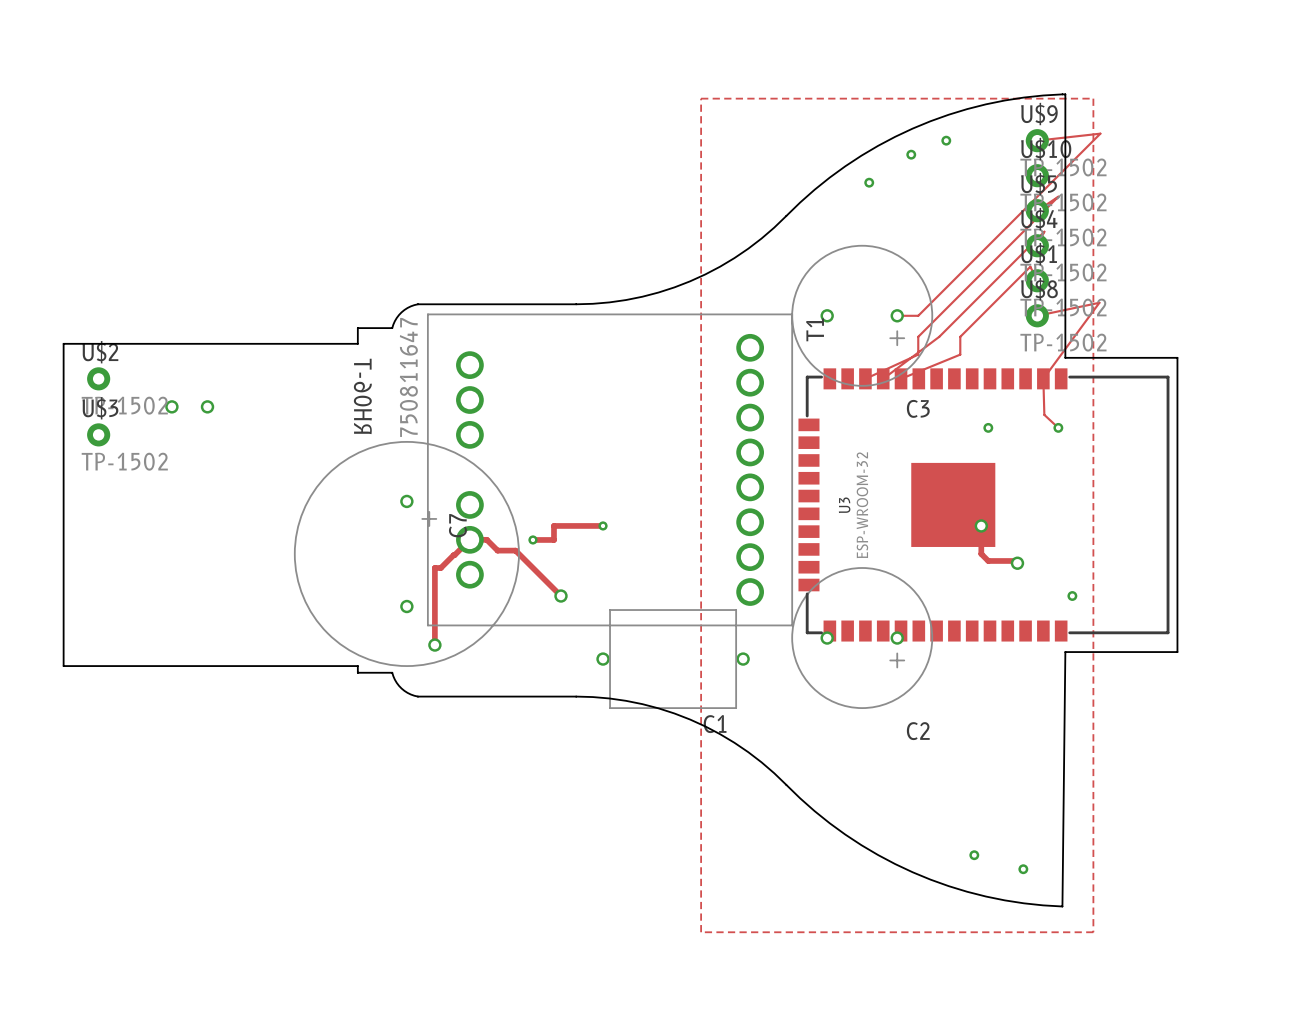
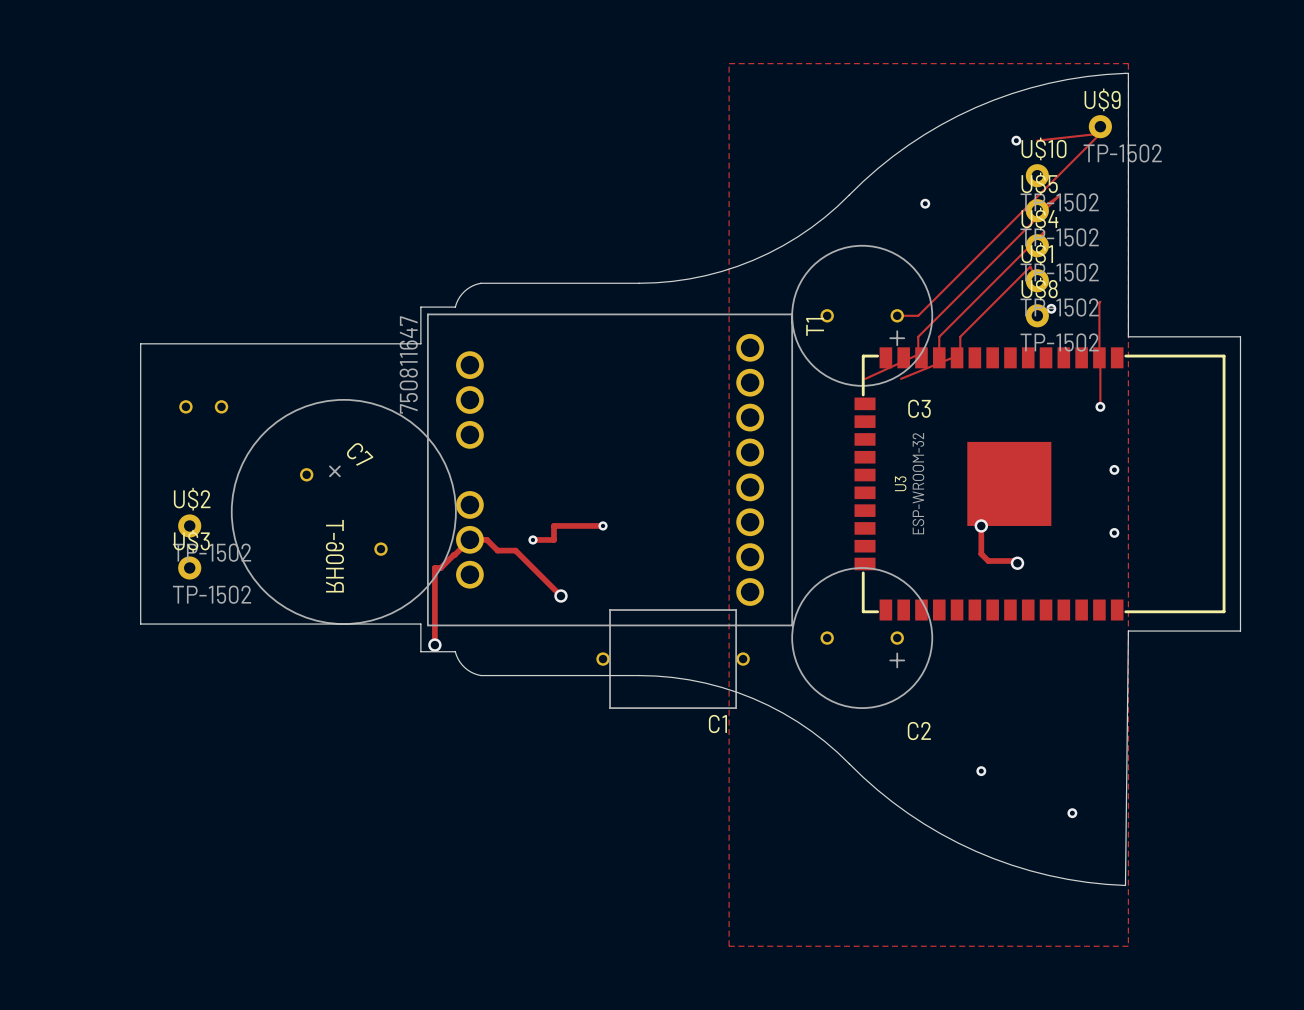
zone outline: (701, 98) (1093, 98) (1093, 932) (701, 932) (701, 98) -> (729, 63) (729, 946) (1128, 946) (1128, 63) (729, 63)
via: (946, 140) -> none
via: none -> (1016, 140)
U$9 position: (1037, 140) -> (1100, 126)
via: (911, 154) -> none
via: (869, 182) -> none
via: none -> (925, 203)
track: none -> (1100, 301) (1100, 406)
via: none -> (1051, 308)
track: (1037, 315) (1099, 302) (1043, 378) (1044, 414) (1058, 427) -> none
track: (939, 336) (883, 378) -> (939, 336) (939, 357)
board edge: (140, 343) (63, 343) (63, 666) (357, 666) (357, 672) (392, 672) (401, 688) (417, 696) (592, 697) (642, 704) (690, 719) (734, 742) (761, 762) (829, 823) (861, 845) (895, 864) (948, 886) (985, 896) (1023, 903) (1062, 906) (1065, 652) (1177, 652) (1177, 357) (1065, 357) (1065, 94) (1023, 97) (985, 104) (948, 114) (895, 136) (861, 155) (829, 177) (748, 248) (705, 274) (674, 287) (642, 296) (592, 303) (417, 304) (401, 312) (392, 328) (357, 328) (357, 343) -> (140, 343) (140, 624) (420, 624) (420, 651) (455, 651) (464, 667) (481, 675) (655, 676) (689, 679) (721, 687) (768, 705) (797, 721) (824, 741) (892, 802) (924, 824) (958, 843) (1011, 865) (1048, 875) (1086, 882) (1125, 885) (1128, 631) (1240, 631) (1240, 336) (1128, 336) (1128, 73) (1086, 76) (1048, 83) (1011, 93) (958, 115) (924, 134) (892, 156) (811, 227) (768, 253) (737, 266) (705, 275) (655, 282) (481, 283) (464, 291) (455, 307) (420, 307) (420, 343) (357, 343)
U$2 position: (98, 378) -> (189, 525)
part position: (362, 396) -> (334, 556)
part position: (189, 406) -> (203, 406)
via: none -> (1100, 406)
via: (988, 427) -> none
via: (1058, 427) -> none
U$3 position: (98, 434) -> (189, 567)
via: none -> (1114, 469)
U3 position: (983, 504) -> (1040, 483)
via: none -> (1114, 532)
C7 rotation: 0° (406, 553) -> 45° counterclockwise (343, 511)
via: (1072, 596) -> none
via: none -> (981, 771)
via: none -> (1072, 813)
via: (974, 855) -> none
via: (1023, 869) -> none

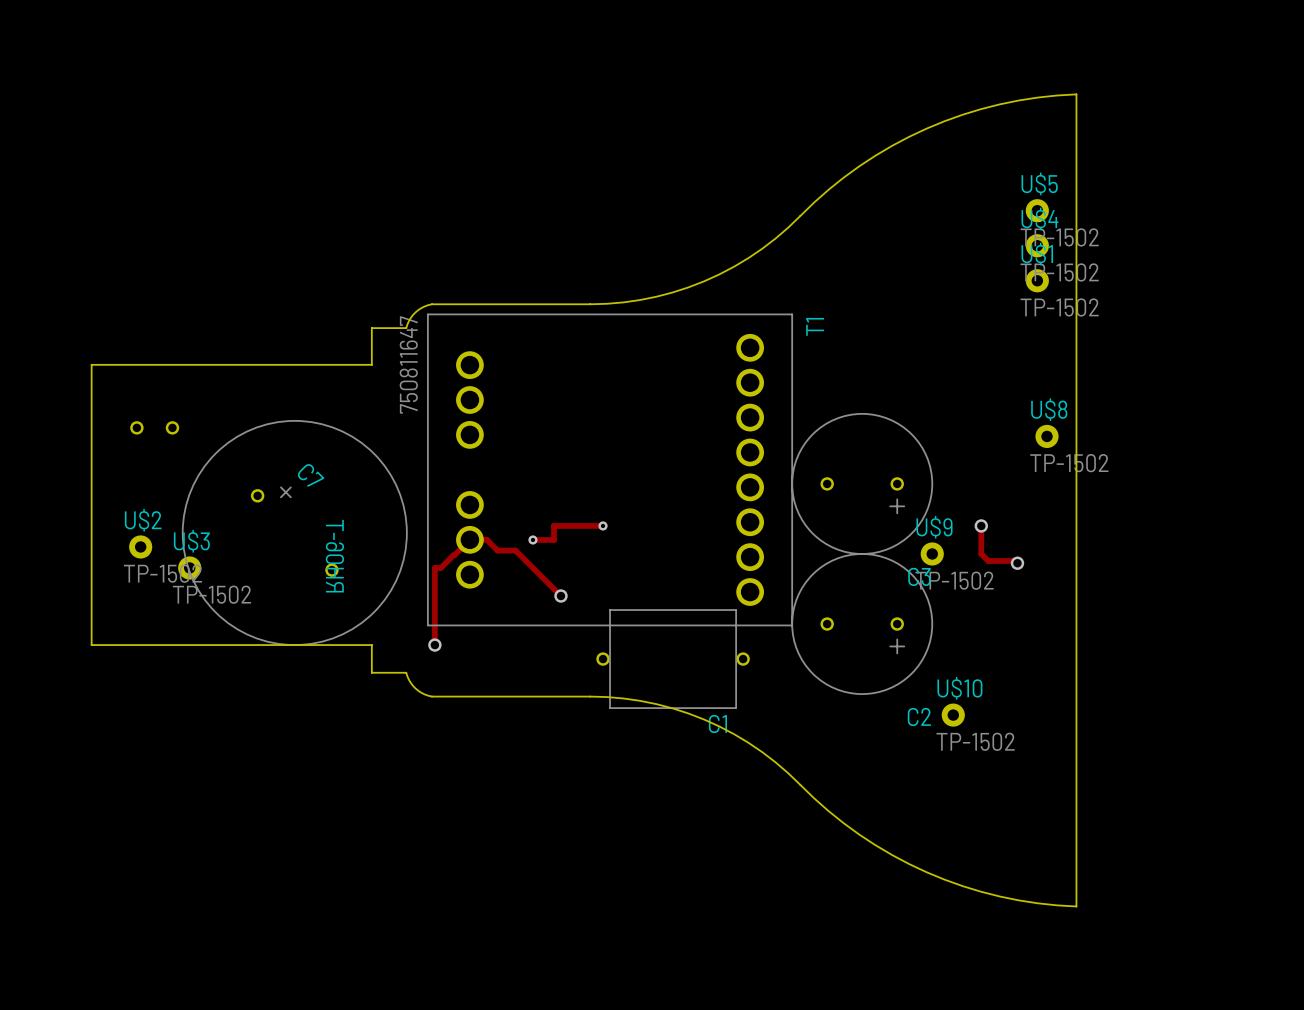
zone outline: (729, 63) (1128, 63) (1128, 946) (729, 946) (729, 63) -> none
board edge: (1125, 73) (1128, 73) (1128, 336) (1240, 336) (1240, 631) (1128, 631) (1125, 885) (1086, 882) (1048, 875) (1011, 865) (958, 843) (924, 824) (892, 802) (824, 741) (797, 721) (768, 705) (721, 687) (689, 679) (655, 676) (481, 675) (464, 667) (455, 651) (420, 651) (420, 624) (140, 624) (140, 343) (420, 343) (420, 307) (455, 307) (462, 294) (477, 284) (655, 282) (689, 279) (721, 271) (768, 253) (797, 237) (824, 217) (892, 156) (924, 134) (958, 115) (1011, 93) (1048, 83) (1086, 76) (1125, 73) -> (1076, 94) (1037, 97) (999, 104) (962, 114) (909, 136) (875, 155) (843, 177) (775, 238) (748, 258) (719, 274) (672, 292) (640, 300) (606, 303) (428, 305) (413, 315) (406, 328) (371, 328) (371, 364) (91, 364) (91, 645) (371, 645) (371, 672) (406, 672) (415, 688) (431, 696) (606, 697) (640, 700) (672, 708) (719, 726) (748, 742) (775, 762) (843, 823) (875, 845) (909, 864) (962, 886) (999, 896) (1037, 903) (1076, 906) (1076, 94)
U$9 position: (1100, 126) -> (932, 553)
via: (1016, 140) -> none
track: (1037, 140) (1100, 133) (918, 315) (897, 315) -> none
U$10 position: (1037, 175) -> (953, 715)
via: (925, 203) -> none
track: (1037, 210) (1058, 196) (918, 336) (918, 354) (865, 378) -> none
track: (1037, 245) (1044, 231) (939, 336) (939, 357) -> none
track: (1037, 280) (1030, 266) (960, 336) (960, 354) (901, 378) -> none
track: (1100, 301) (1100, 406) -> none
via: (1051, 308) -> none
C3 position: (862, 315) -> (862, 483)
U$8 position: (1037, 315) -> (1047, 436)
part position: (203, 406) -> (154, 427)
via: (1100, 406) -> none
via: (1114, 469) -> none
U3: ESP-WROOM-32 (1040, 483) -> none
C7 position: (343, 511) -> (294, 532)
U$2 position: (189, 525) -> (140, 546)
via: (1114, 532) -> none
C2 position: (862, 638) -> (862, 624)
via: (981, 771) -> none
via: (1072, 813) -> none

